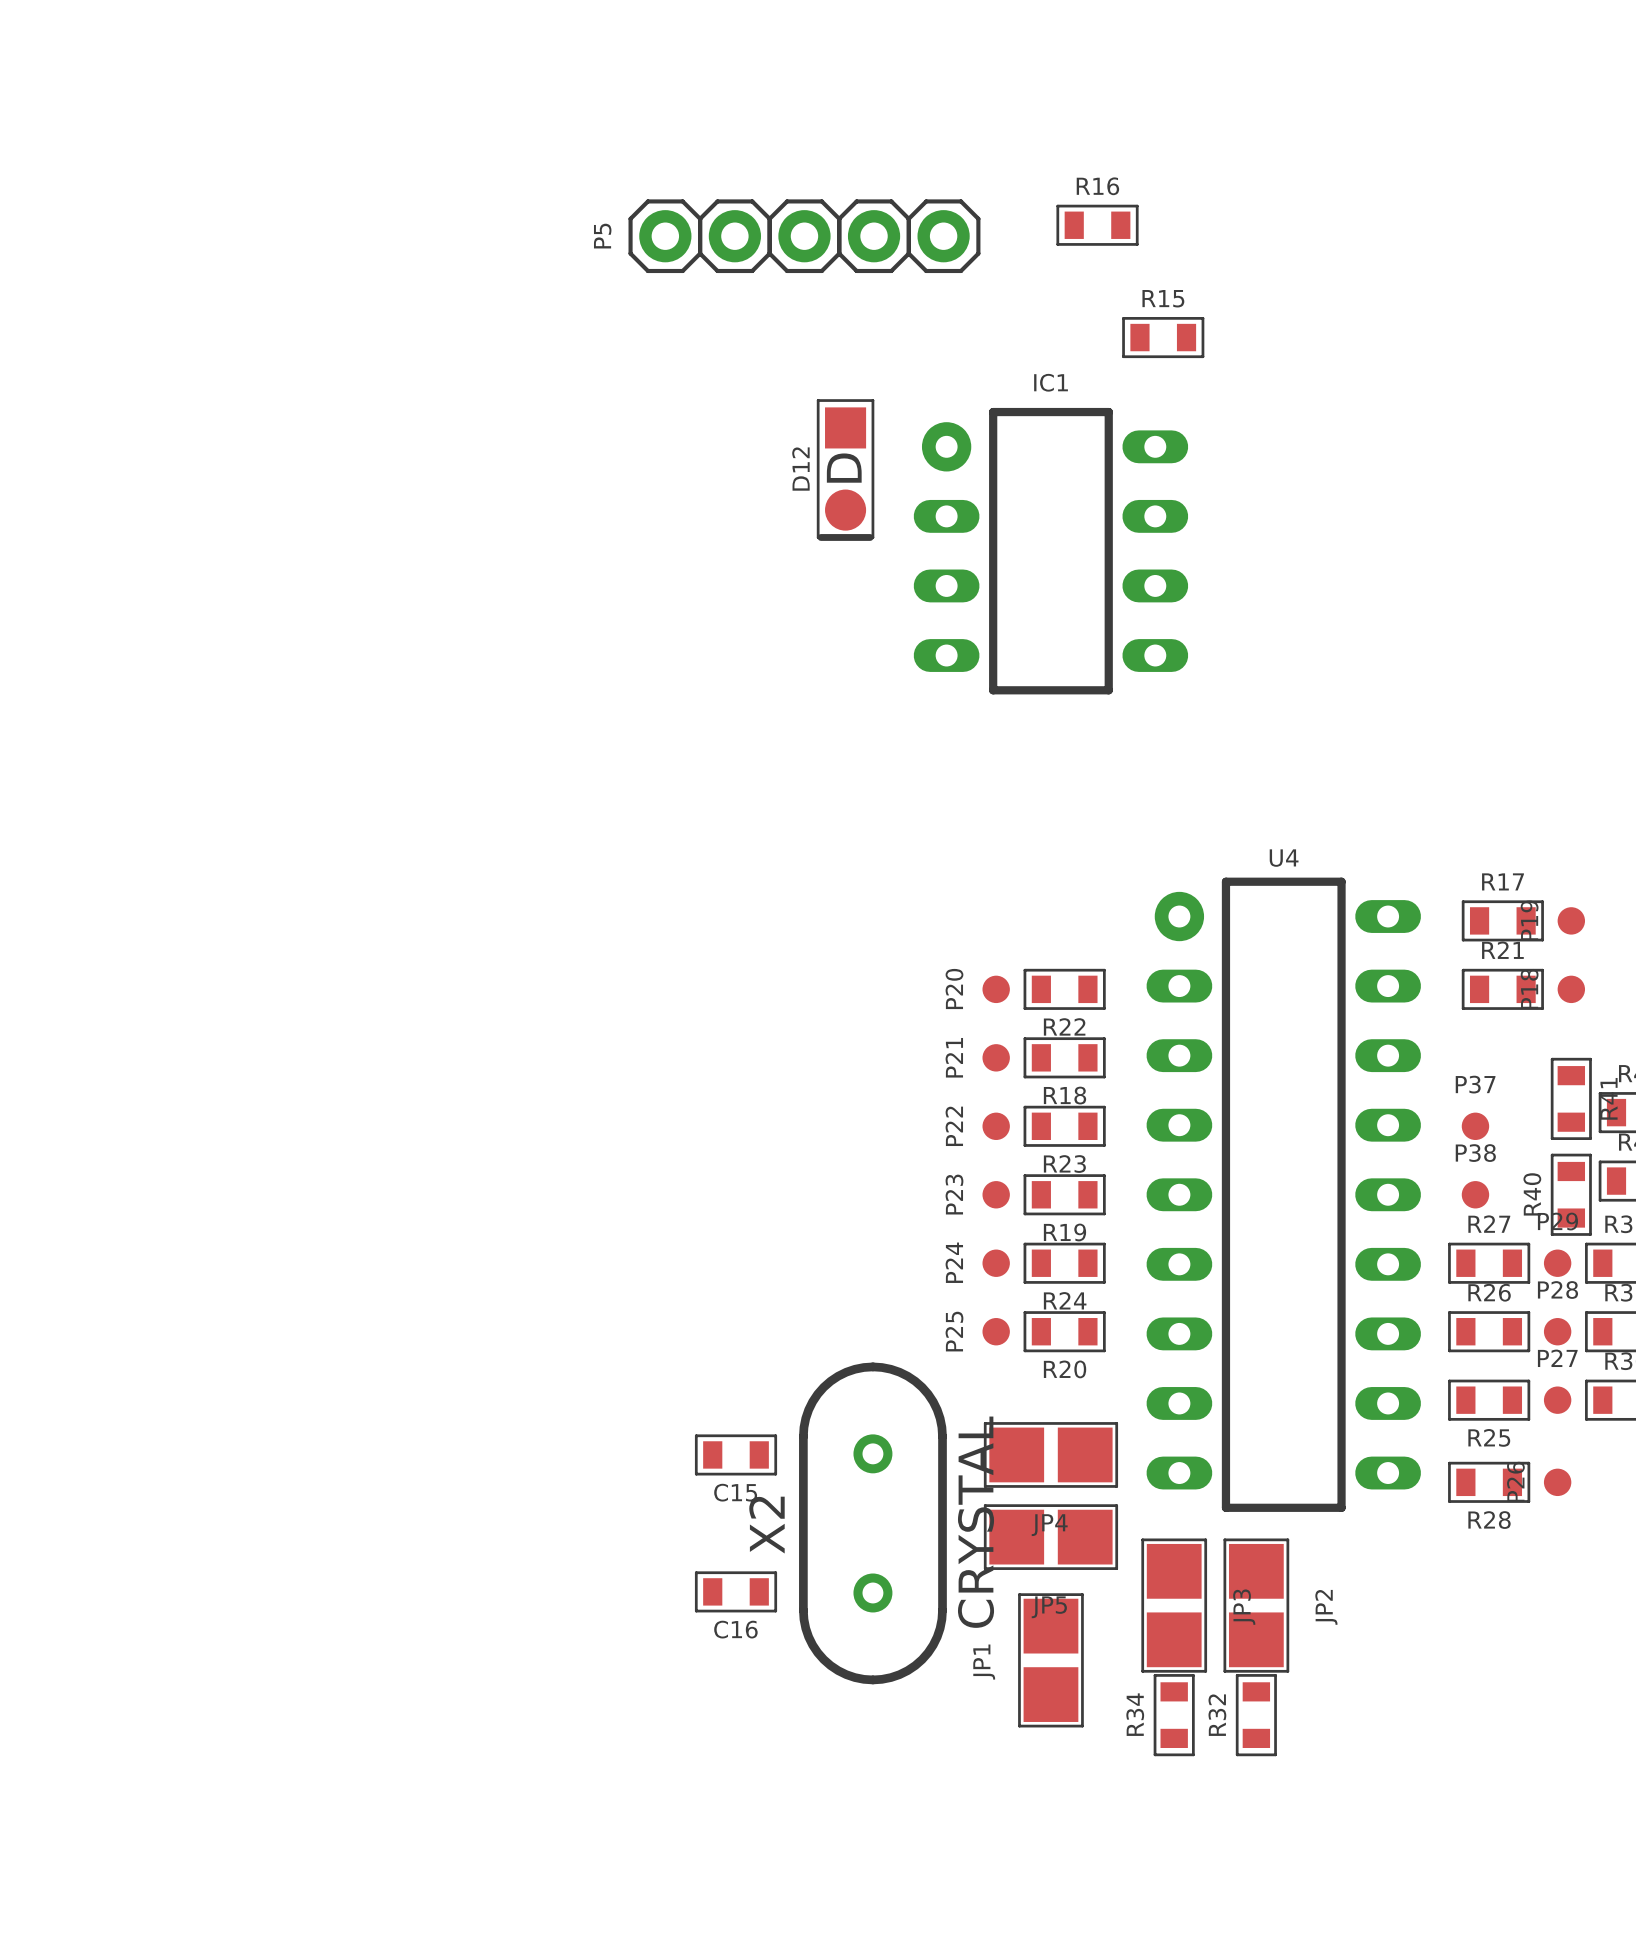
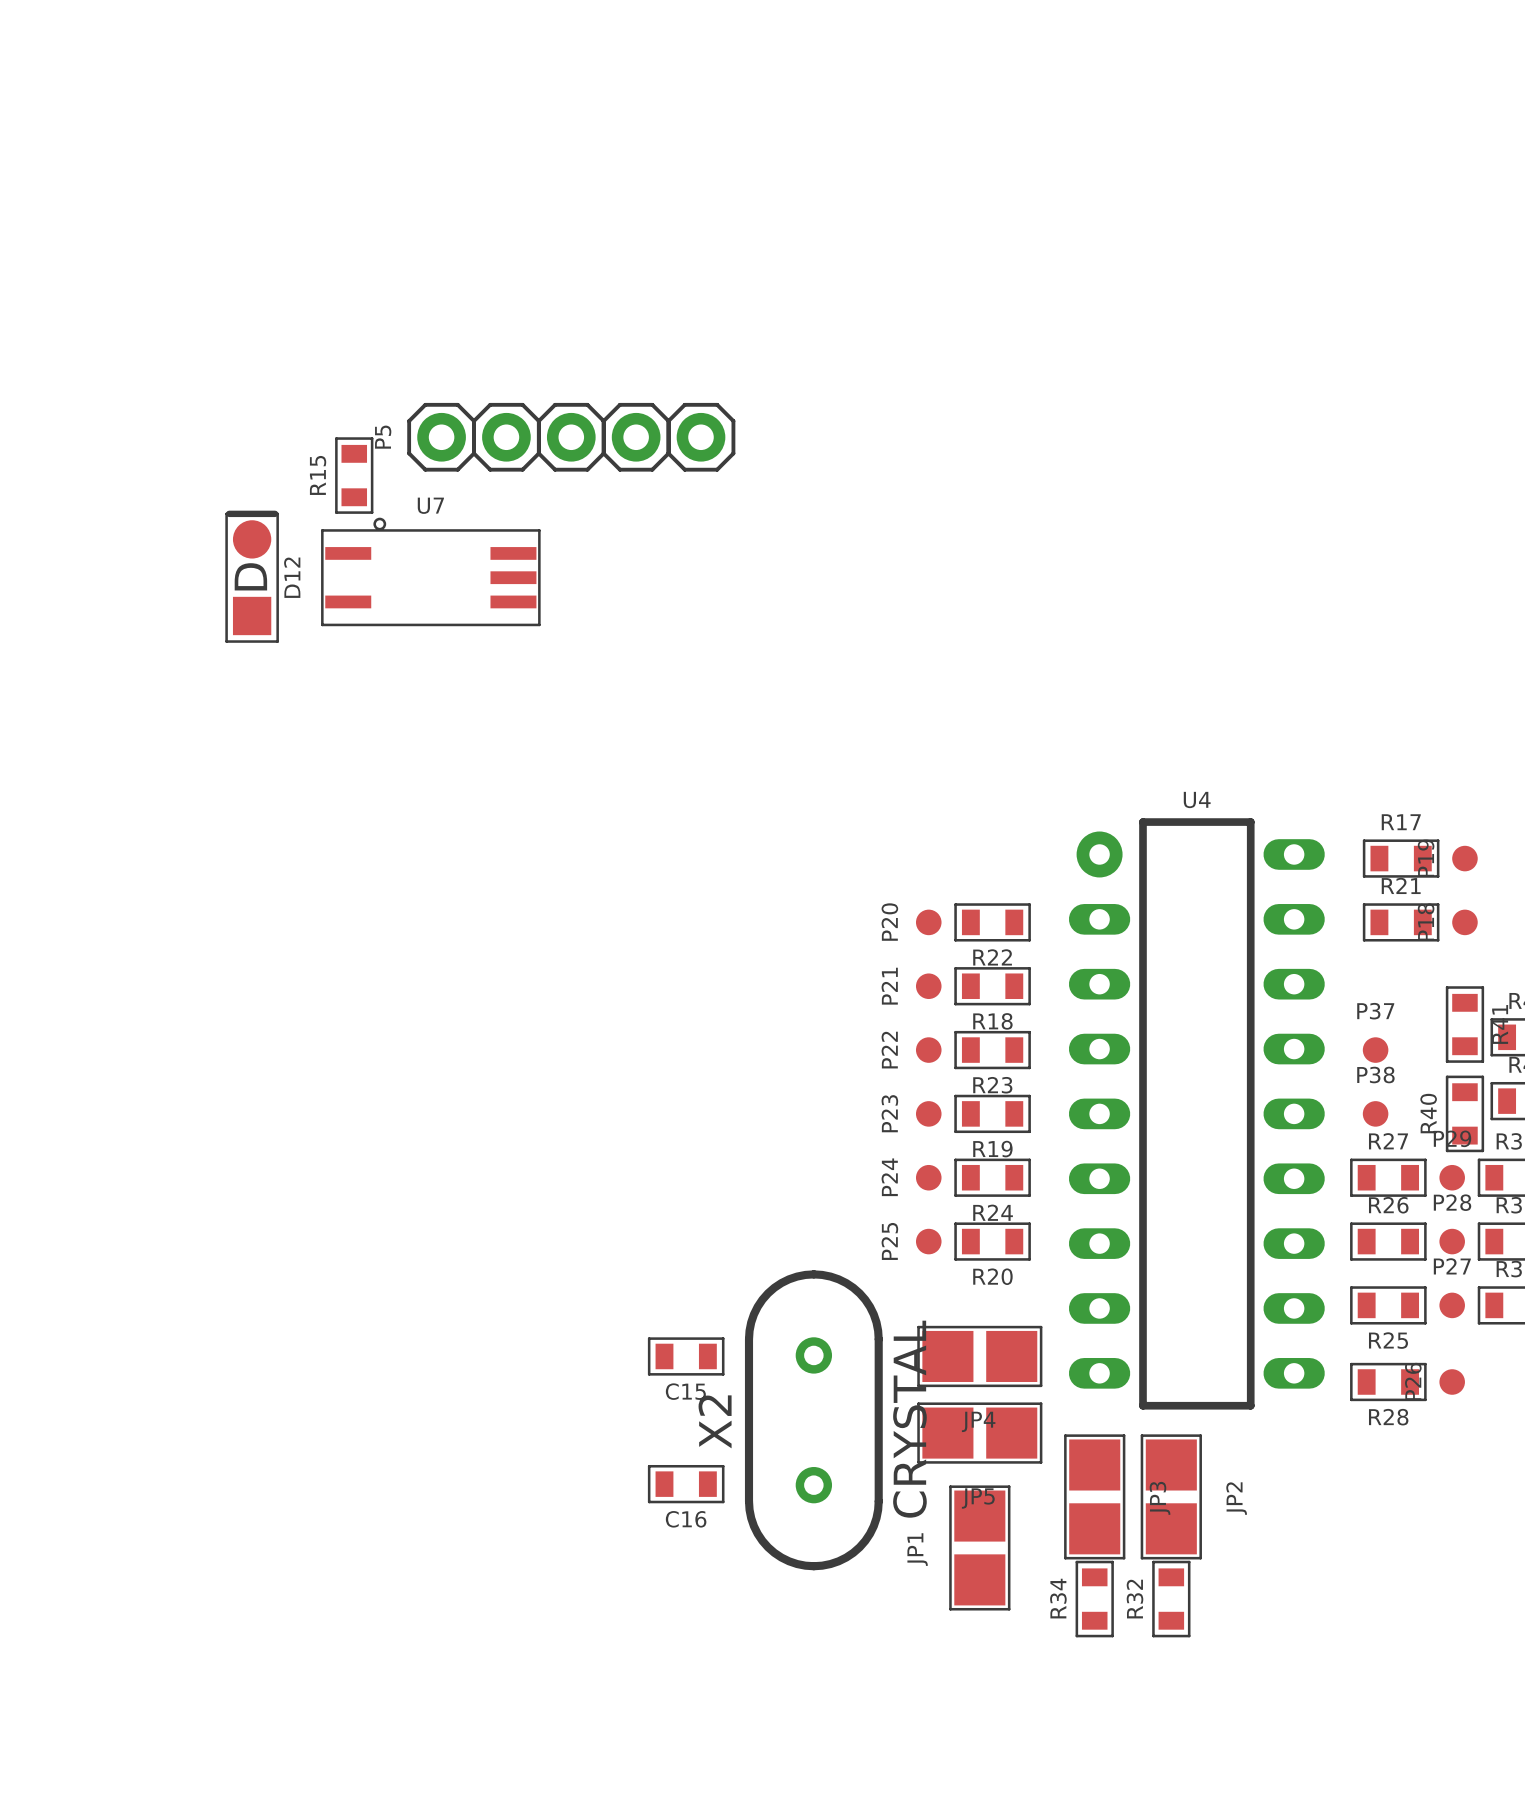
R16: (1097, 225) -> none
P5 position: (804, 236) -> (571, 437)
R15 rotation: 0° (1163, 337) -> 90° clockwise (354, 475)
R15 position: (1163, 337) -> (354, 475)
D12 rotation: 0° (845, 470) -> 180° (252, 576)
D12 position: (845, 470) -> (252, 576)
IC1: (1050, 551) -> none
U7: none -> (430, 571)

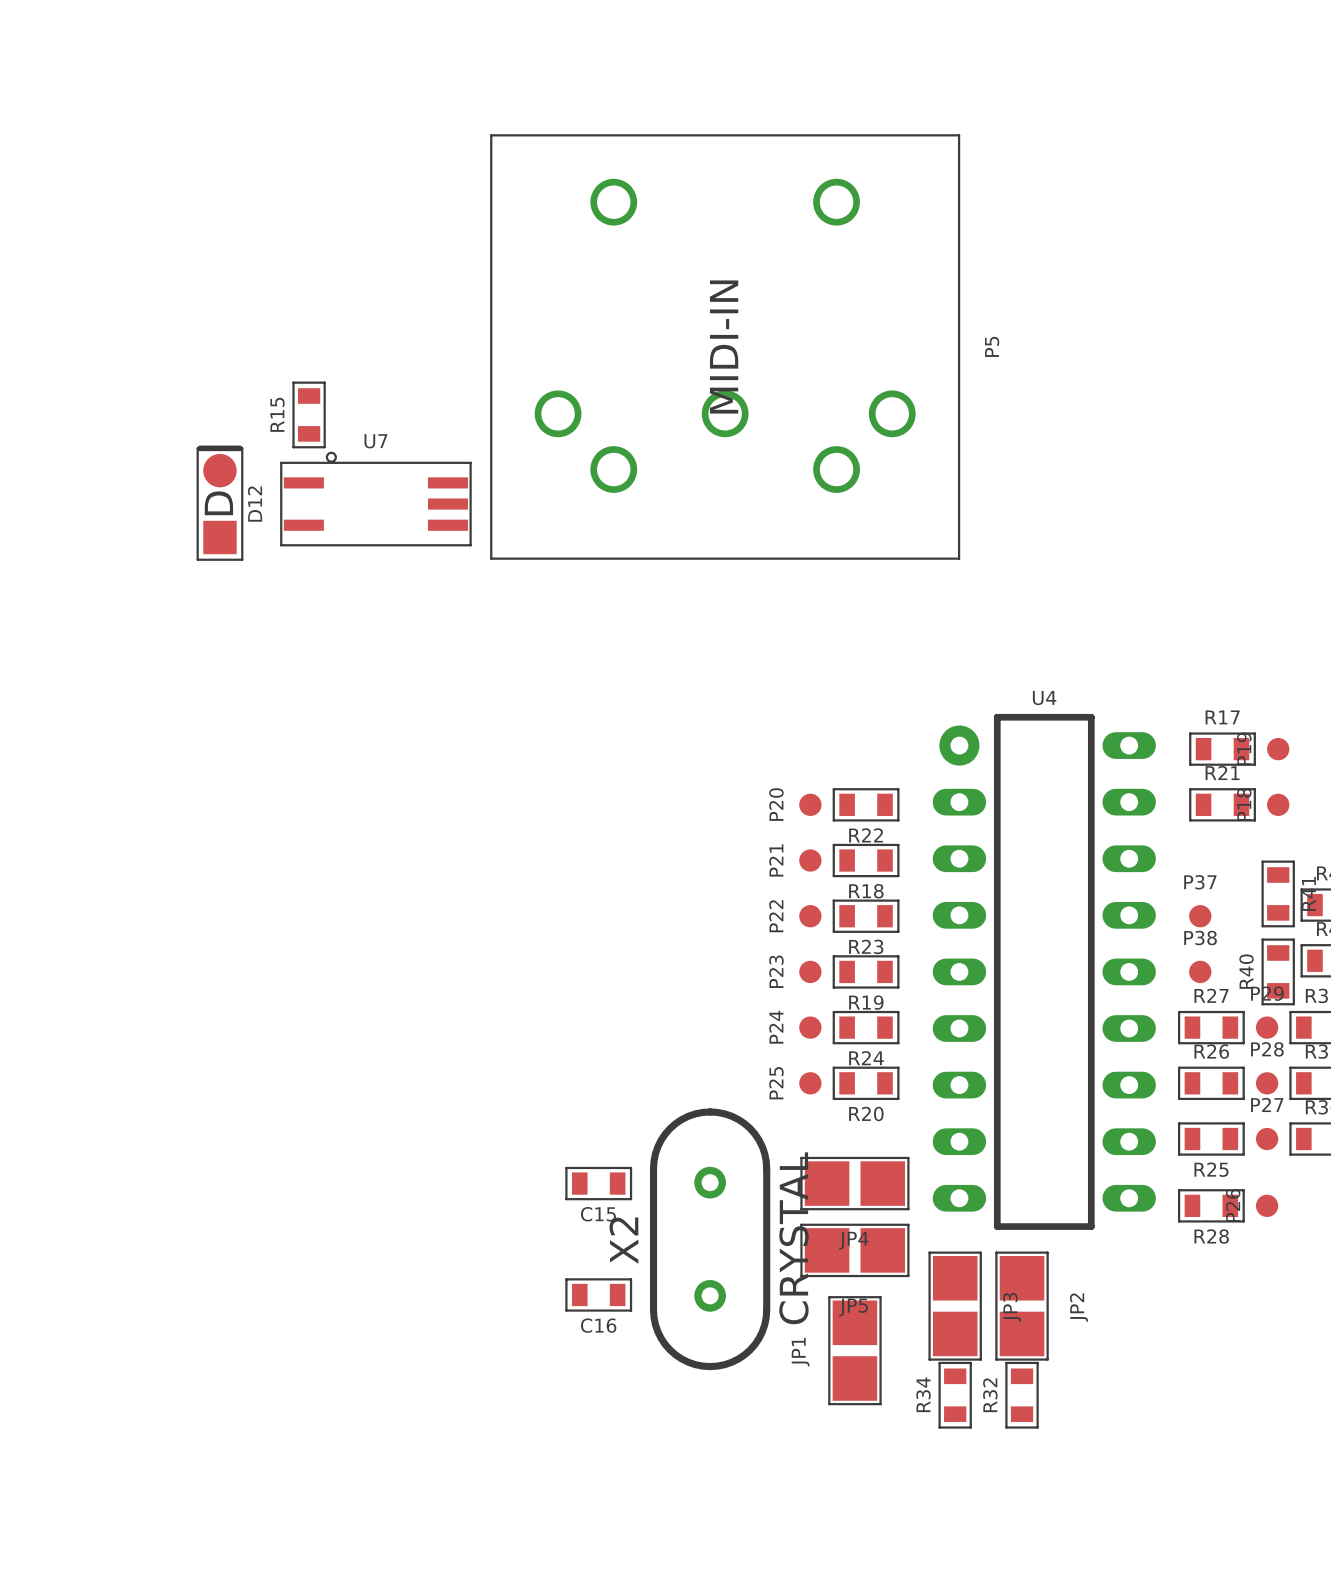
P5 value: none -> MIDI-IN (724, 346)
P5 footprint: [407, 402, 736, 472] -> [490, 134, 961, 560]
P5 name position: P5 (383, 437) -> P5 (992, 346)

